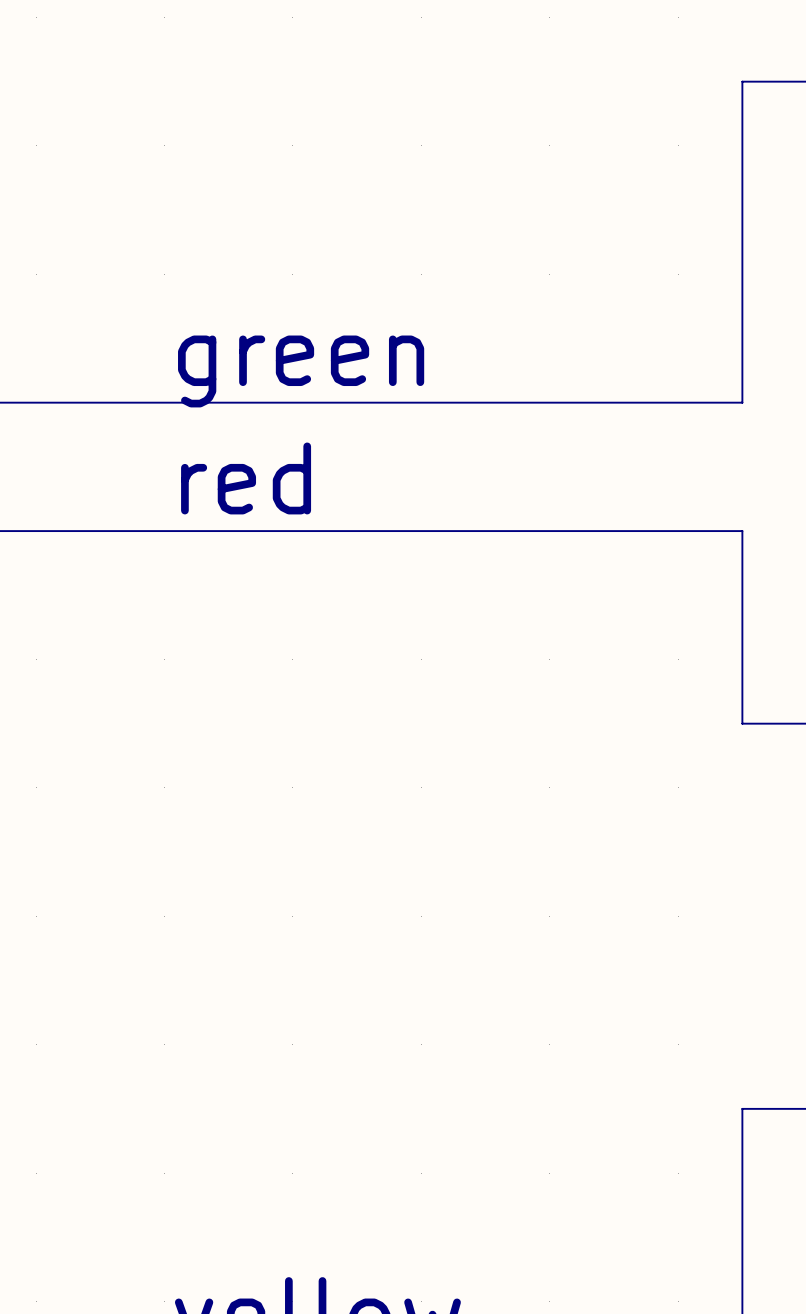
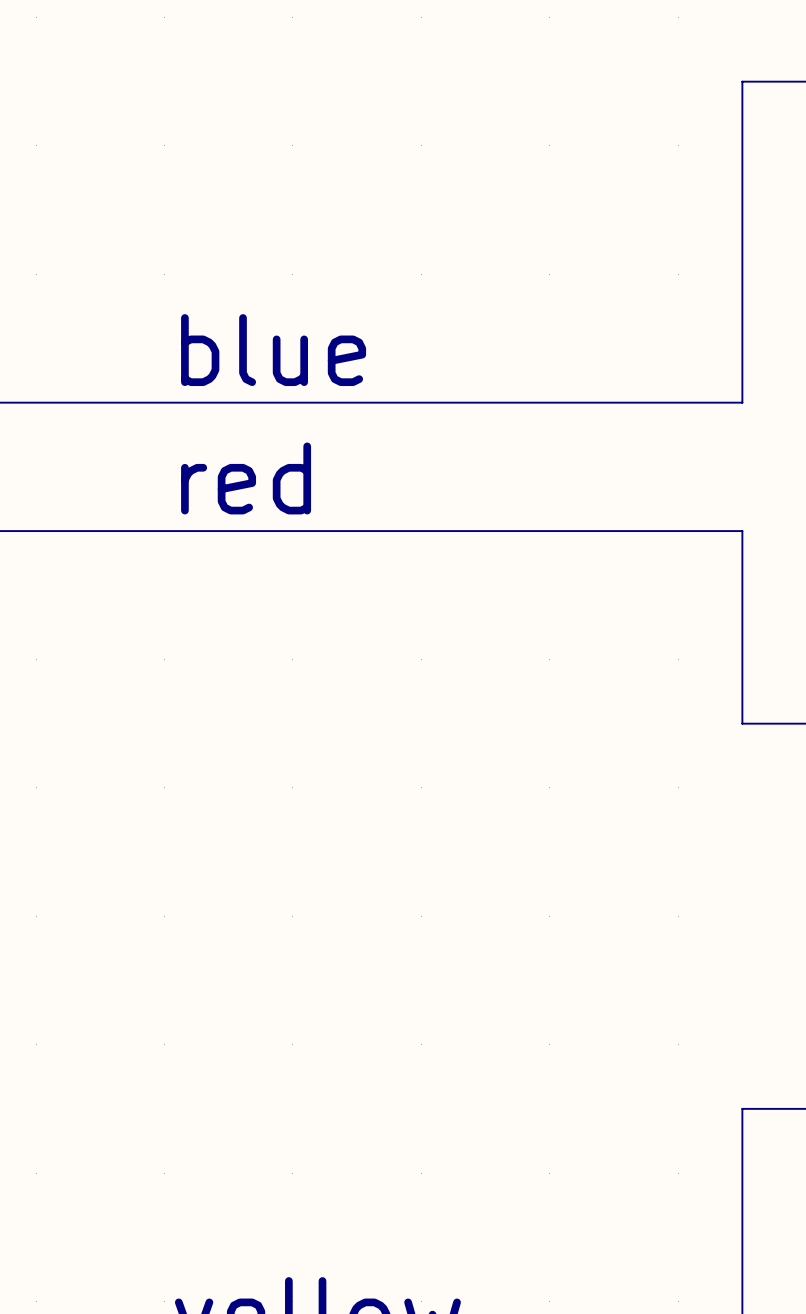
text: green (301, 371) -> blue (273, 350)

